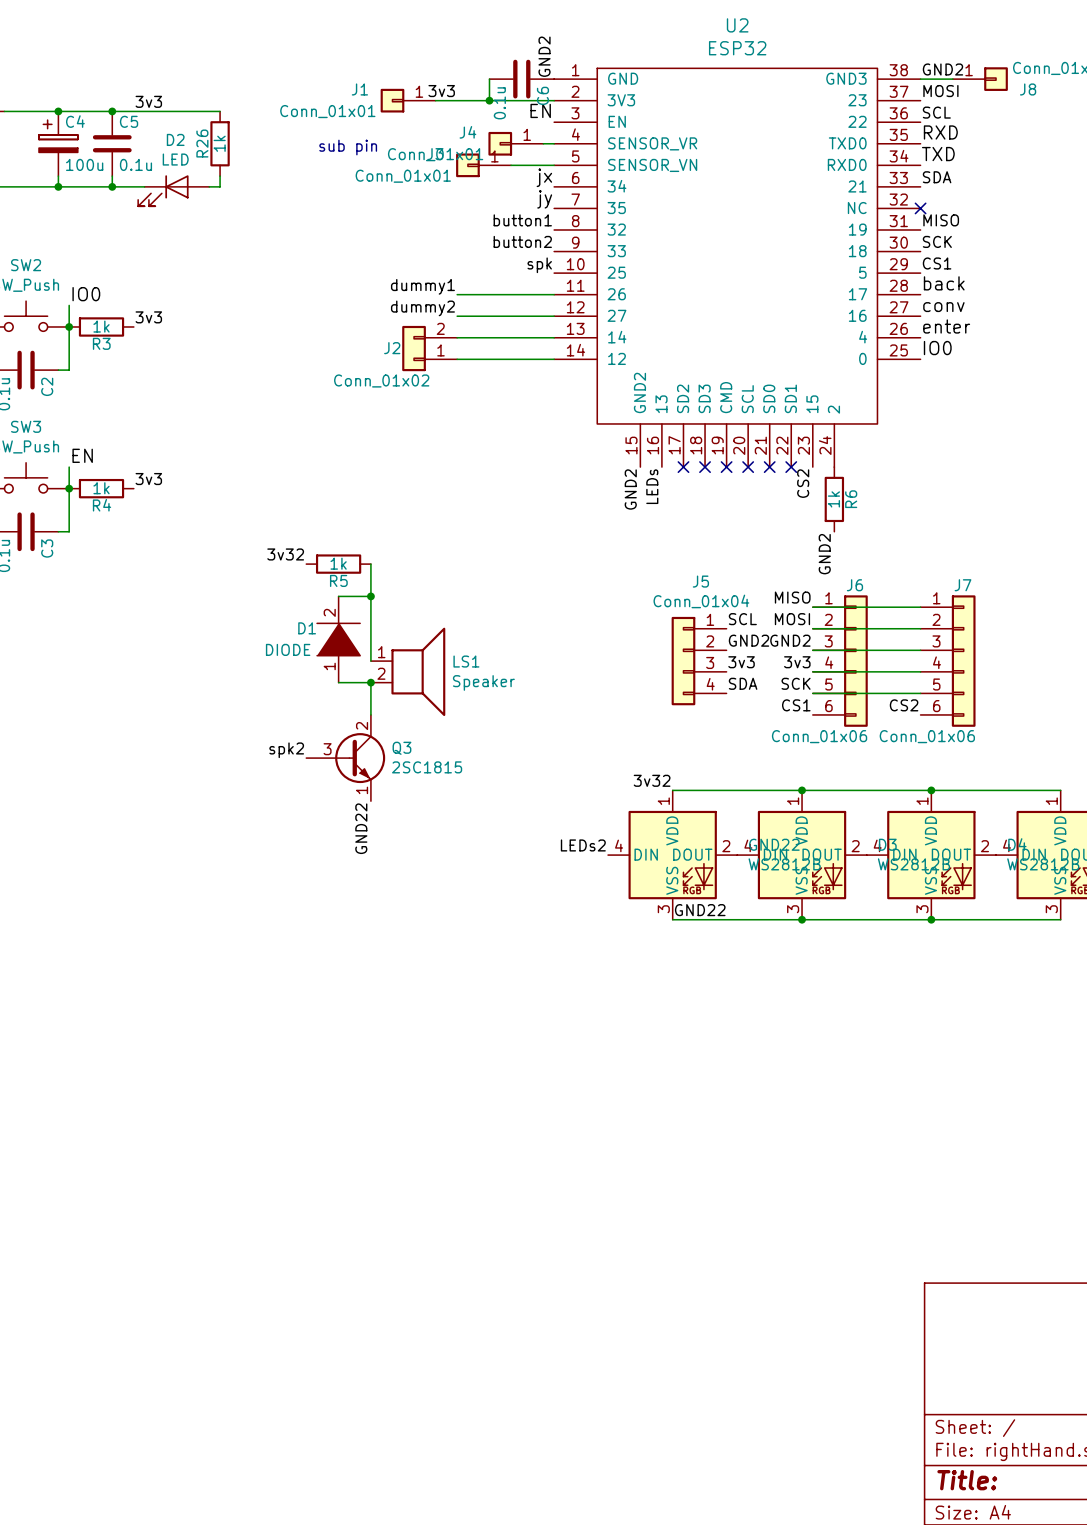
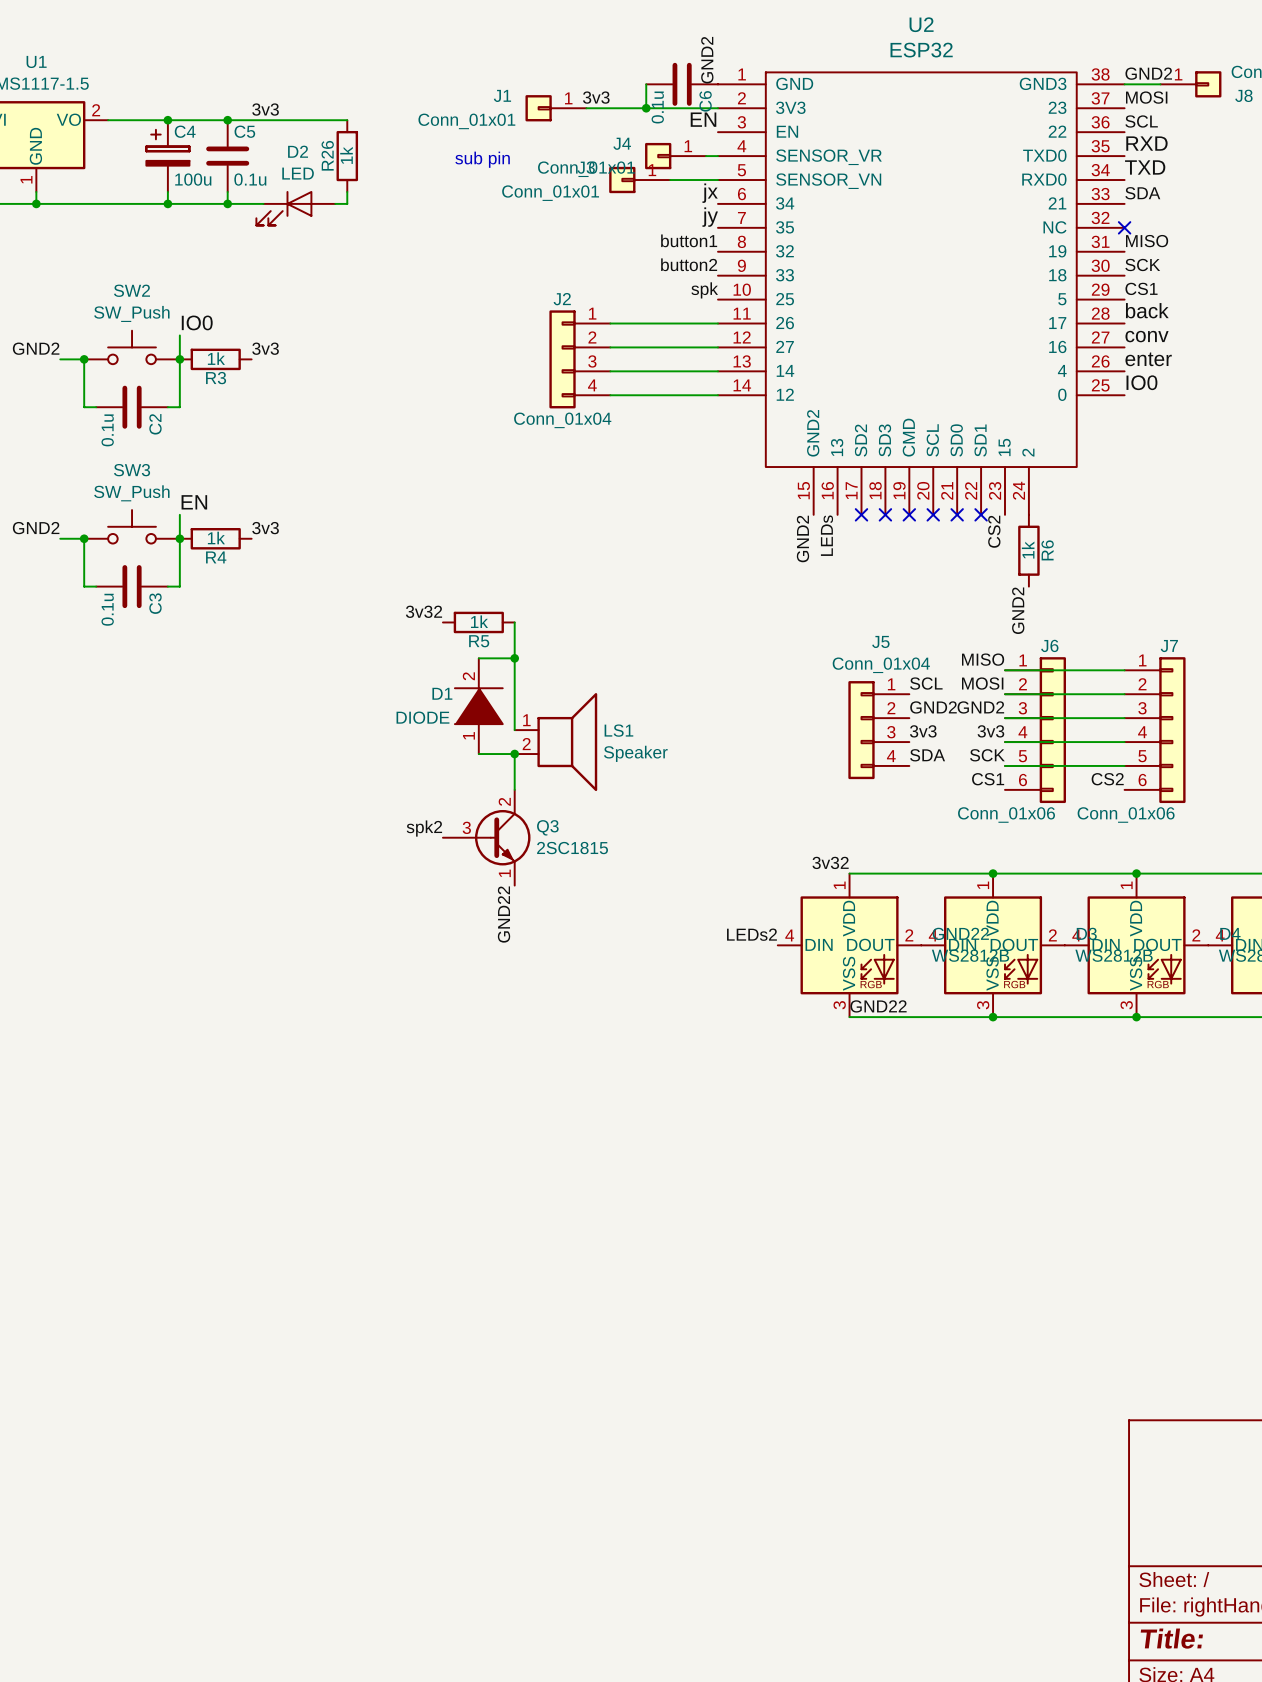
label: dummy1 (422, 286) -> none
label: dummy2 (422, 308) -> none
J2 symbol: [402, 325, 458, 372] -> [549, 310, 611, 409]
J2 name position: J2 (392, 348) -> J2 (562, 299)
J2 value: Conn_01x02 (381, 380) -> Conn_01x04 (562, 420)

